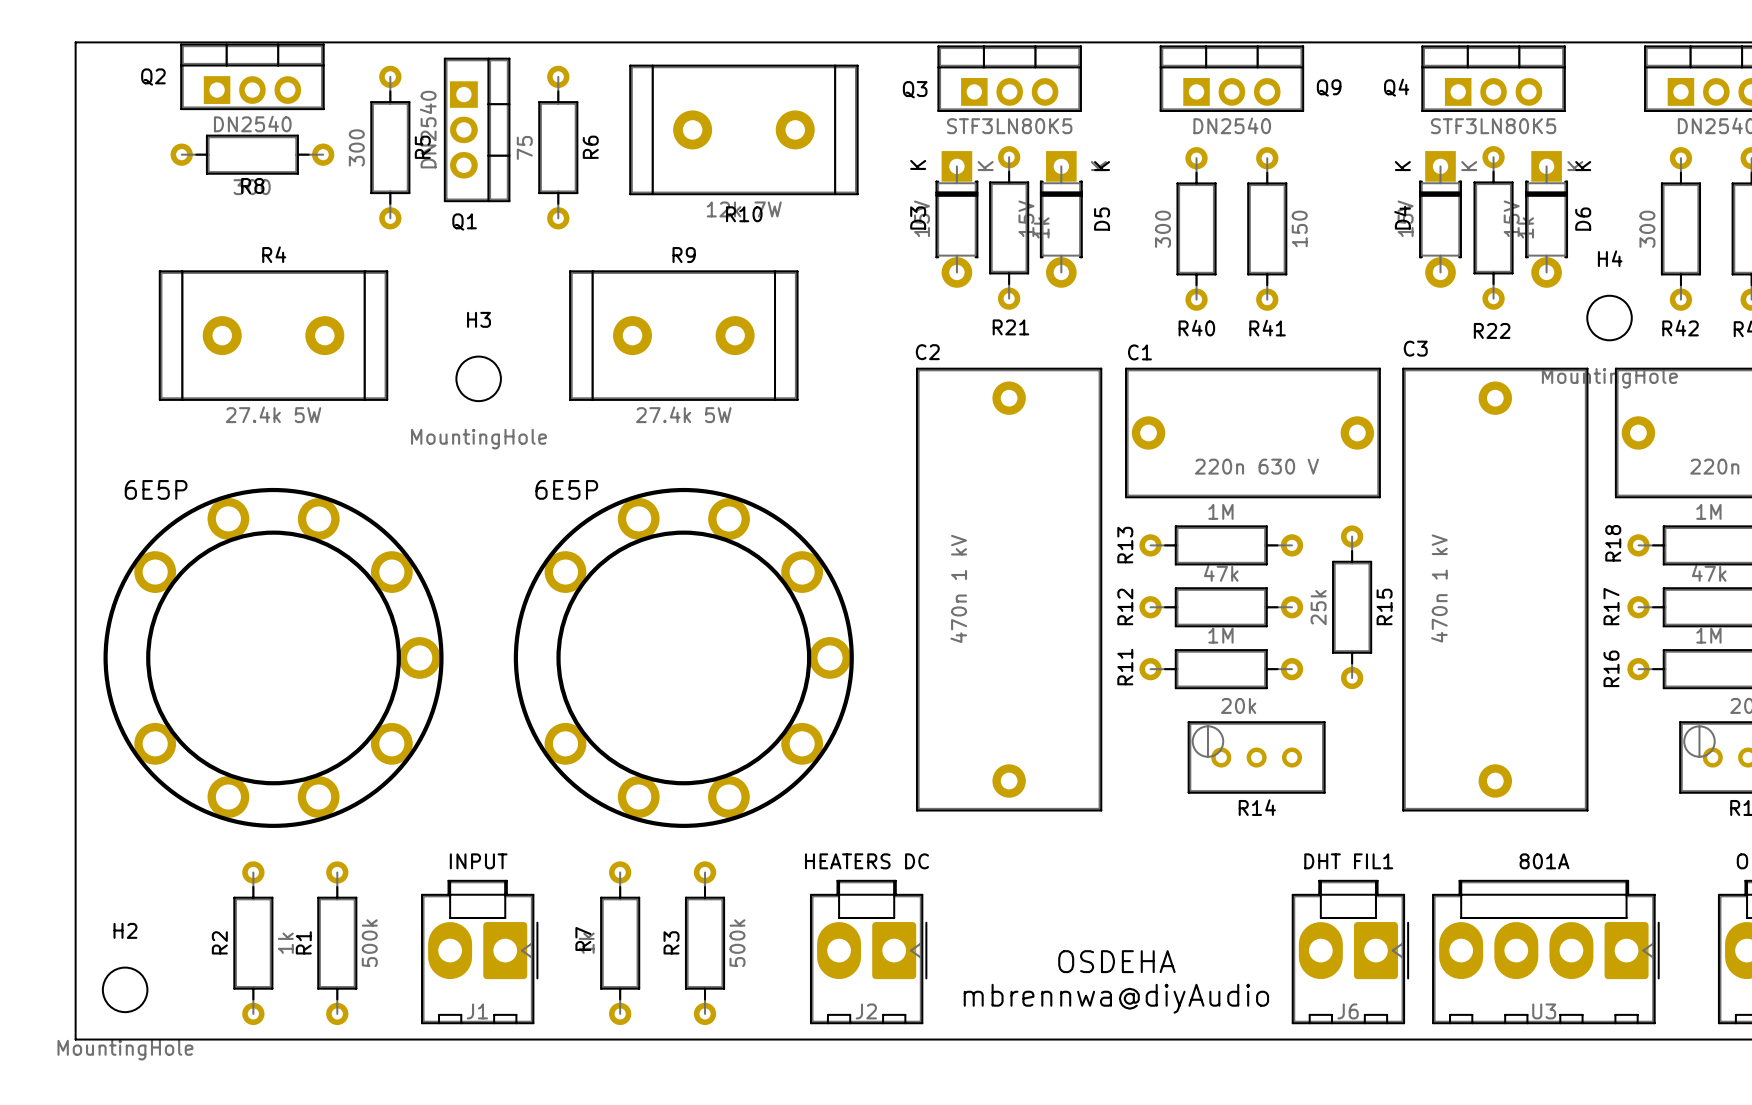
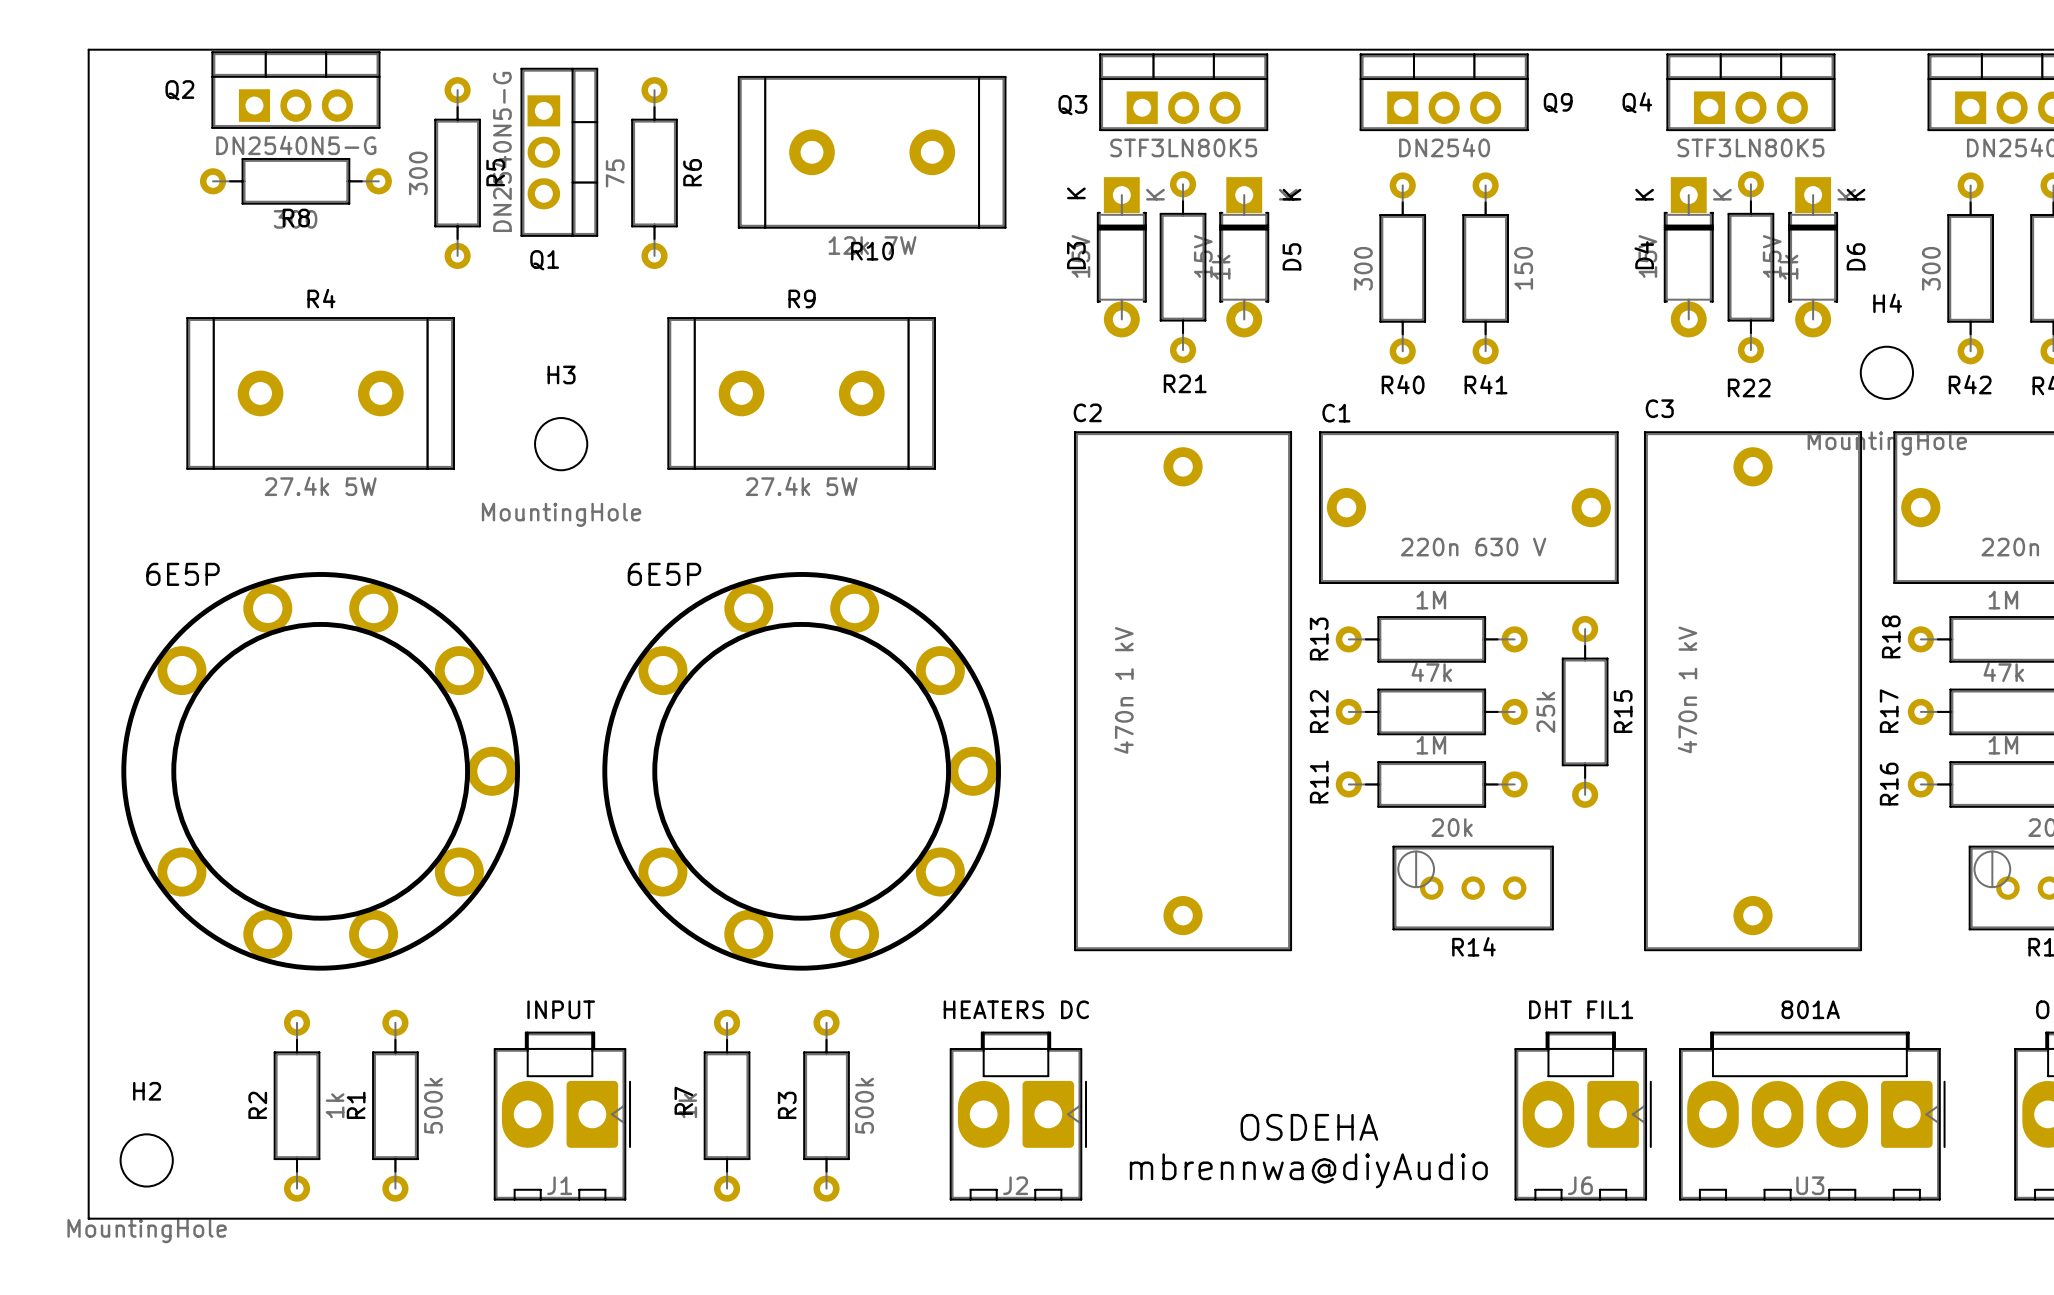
Q2 value: DN2540 (252, 123) -> DN2540N5-G (296, 145)
Q1 value: DN2540 (428, 129) -> DN2540N5-G (502, 151)

